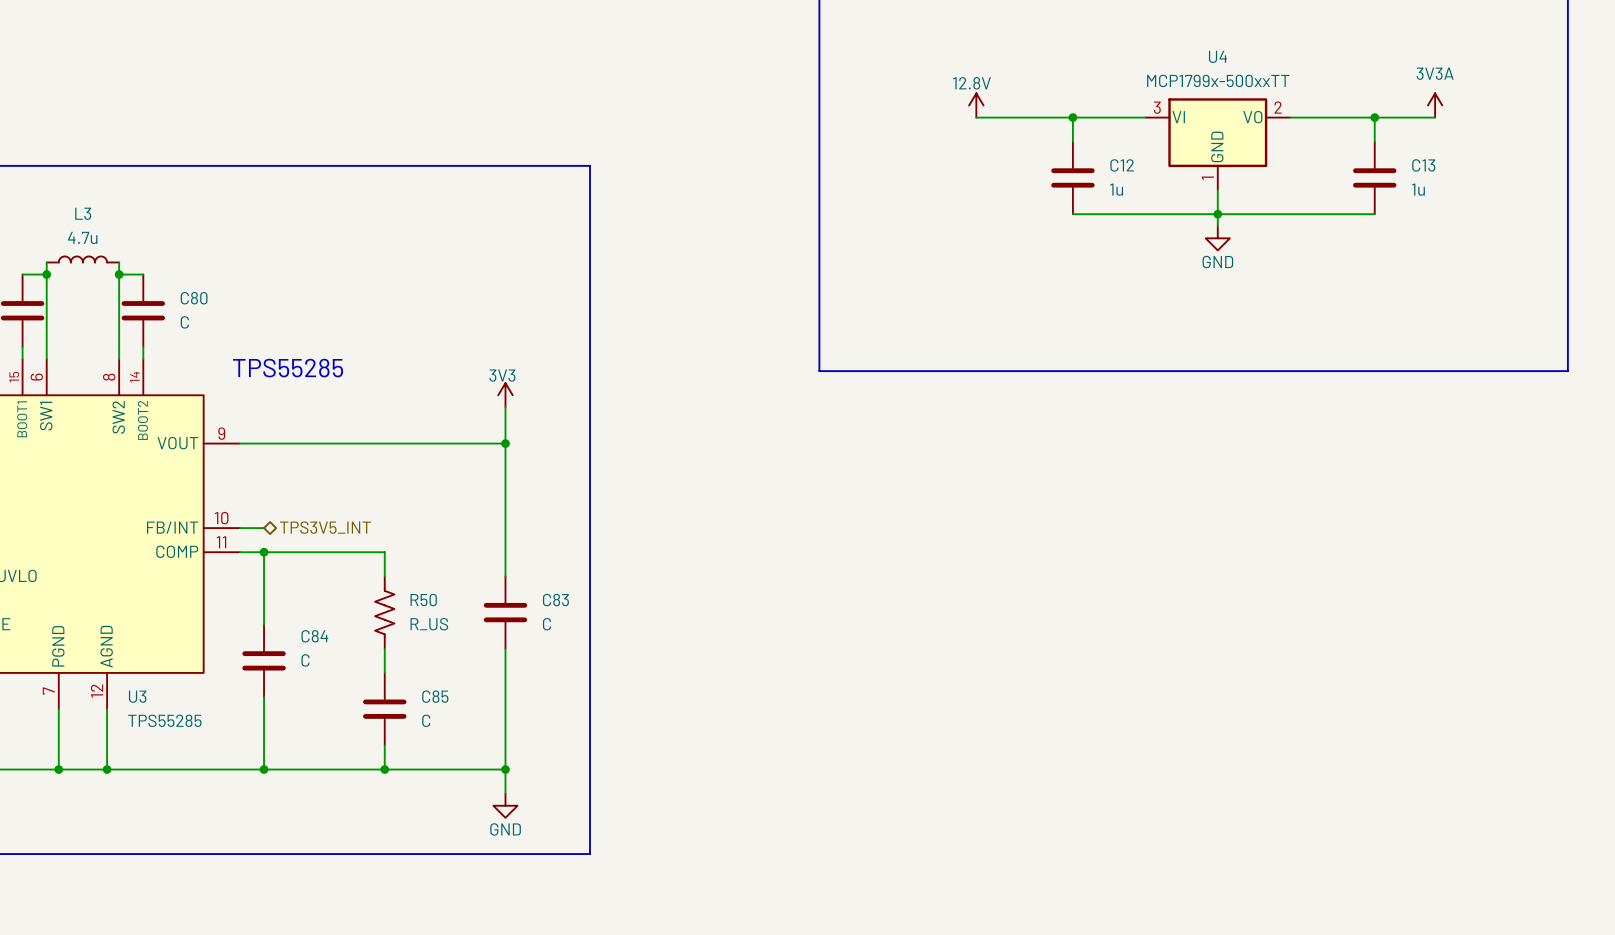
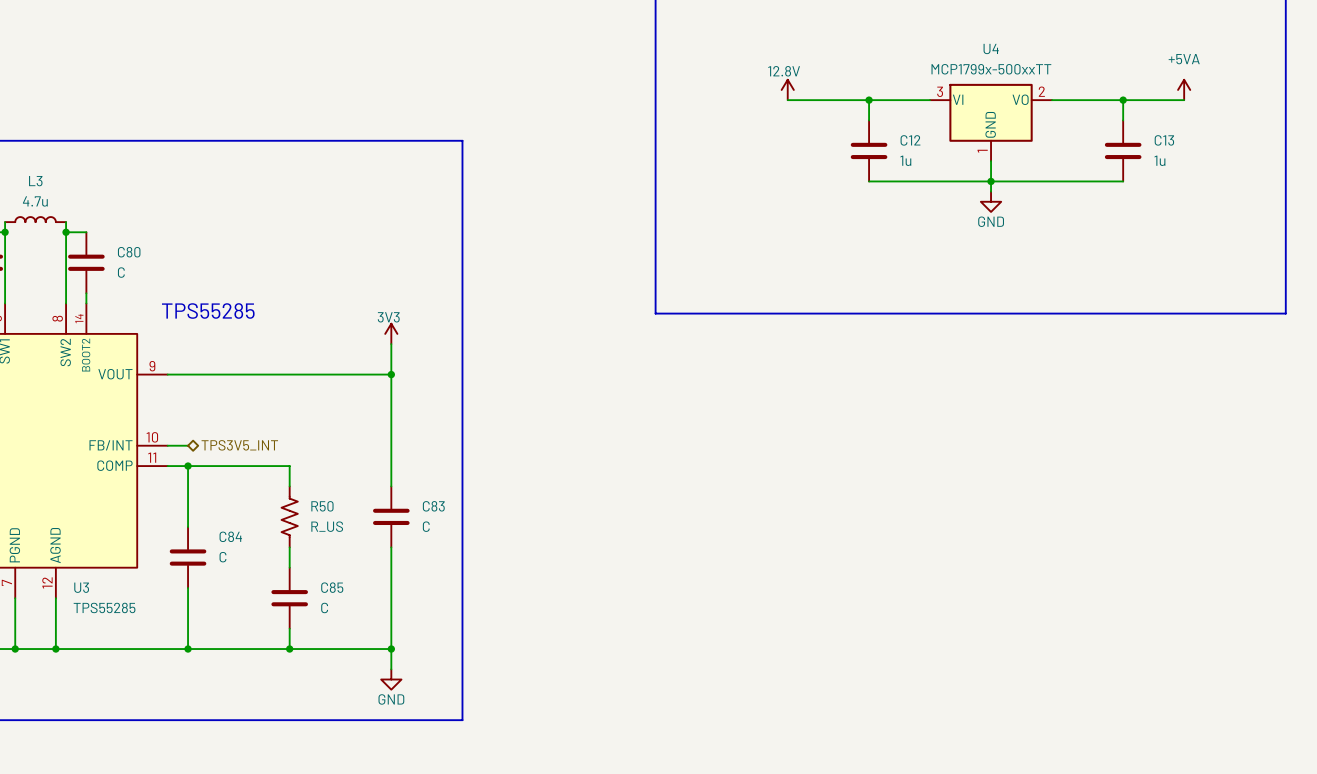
power symbol: 3V3A (1435, 105) -> none
power symbol: none -> +5VA (1184, 89)
wire: none -> (1173, 100) (1184, 100)

